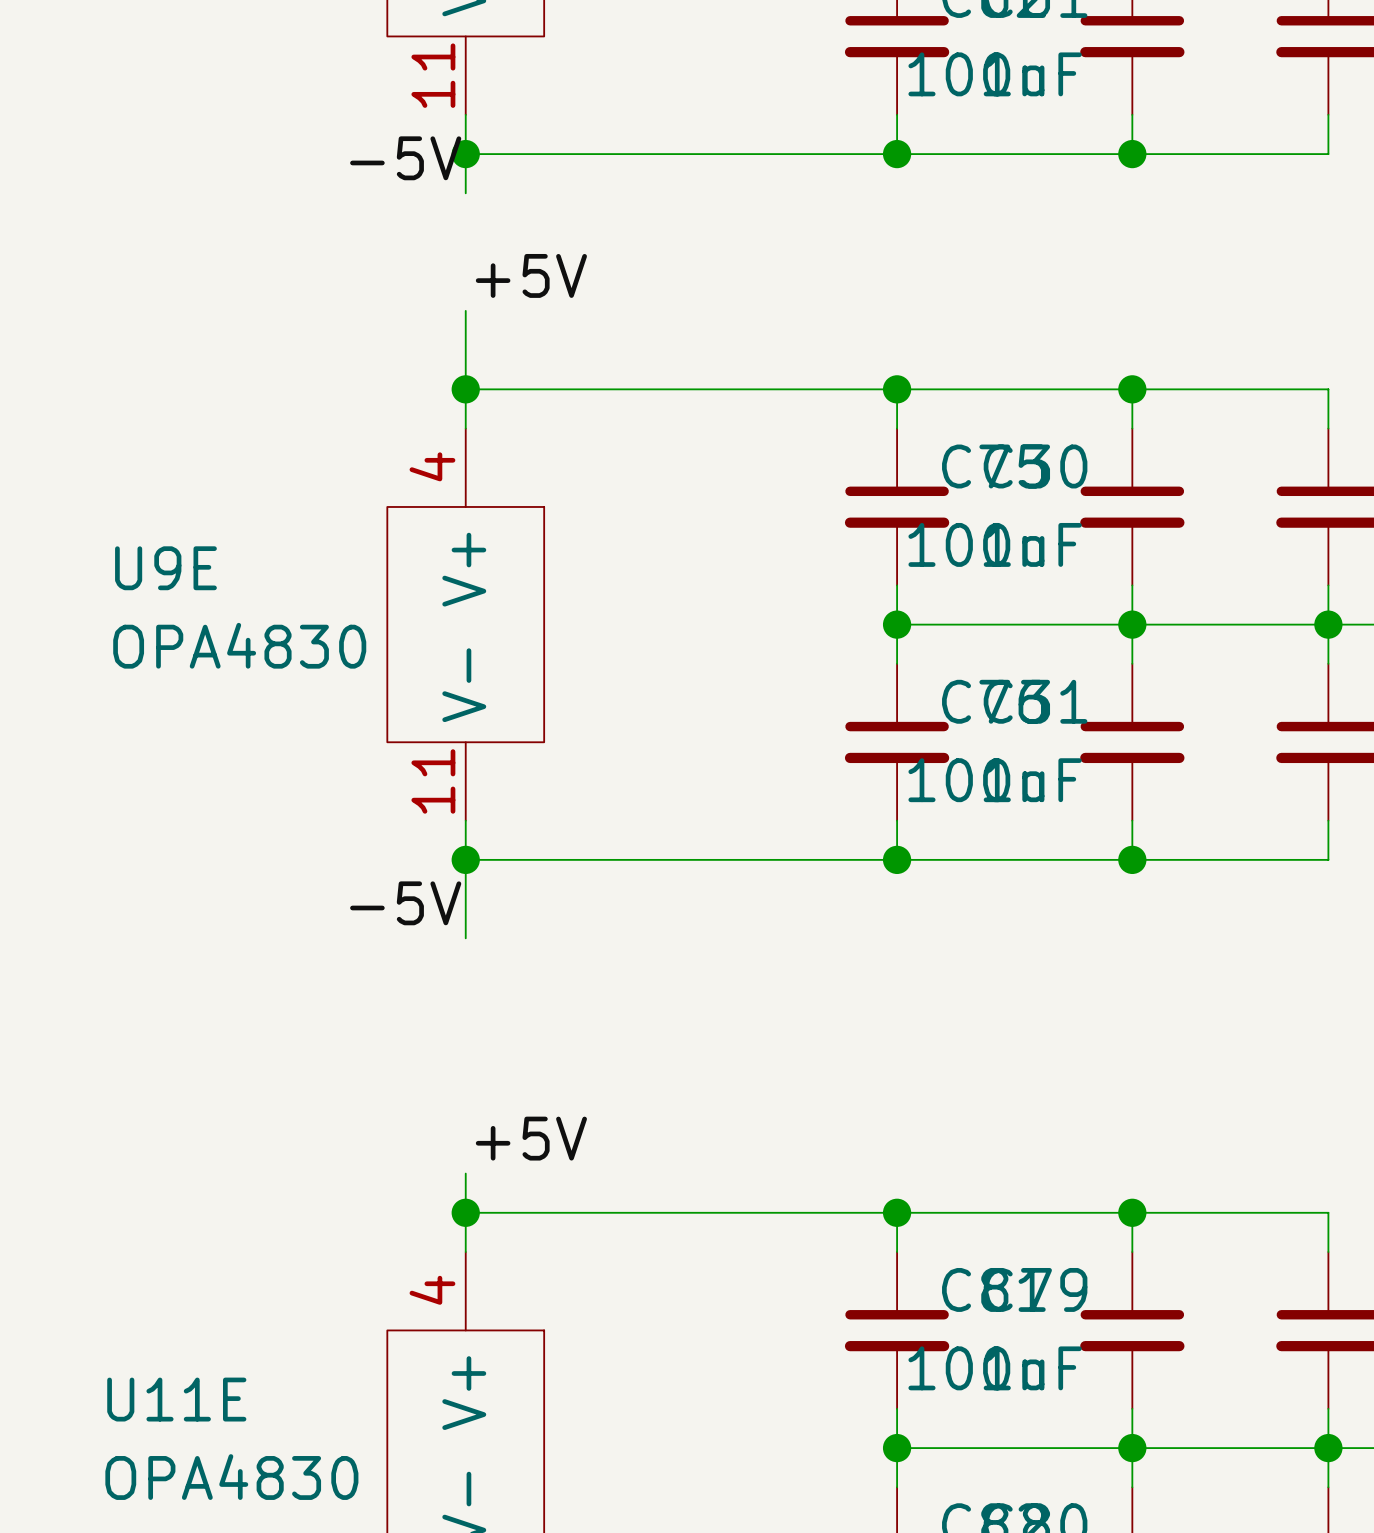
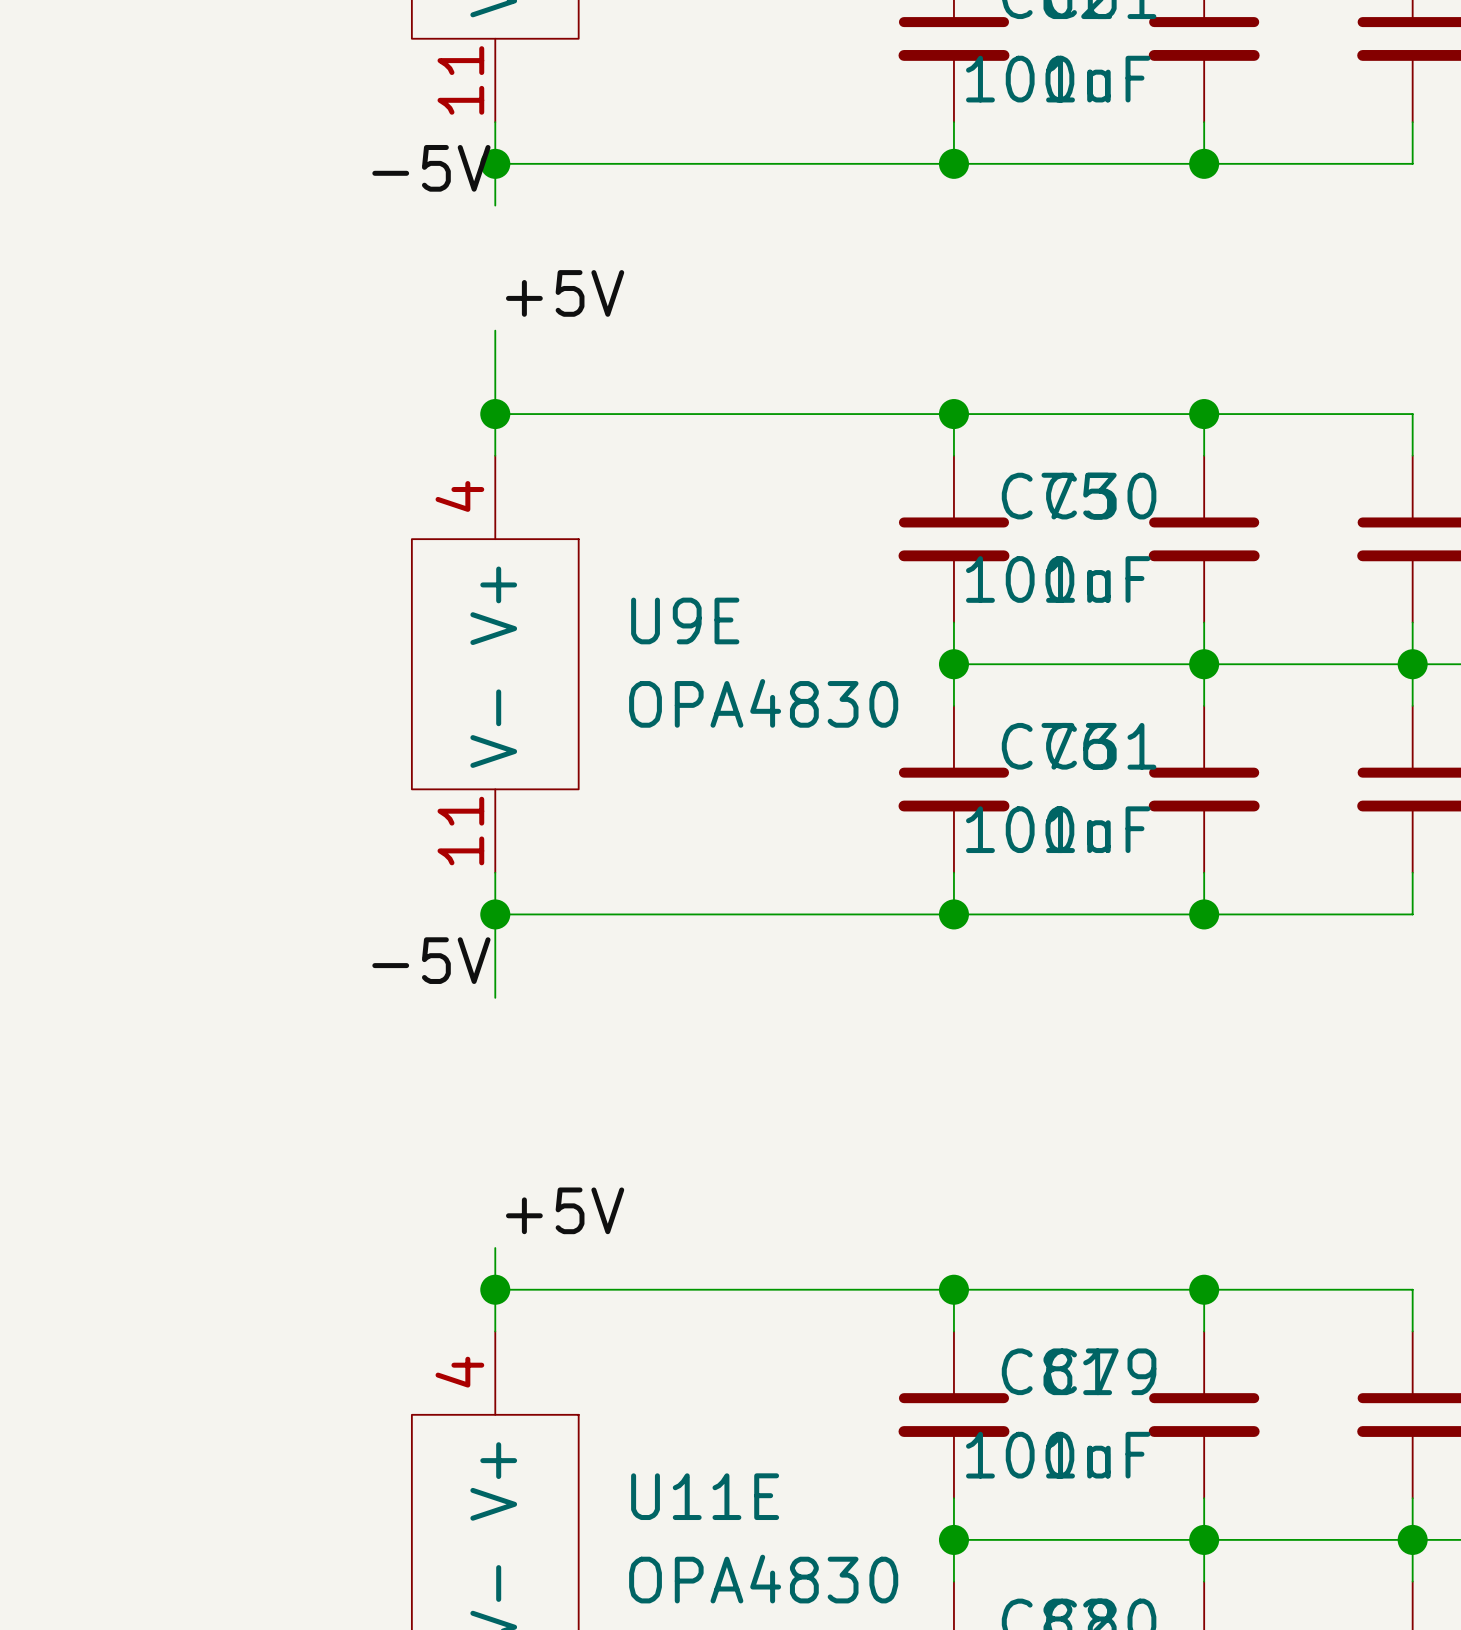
U9E name position: U9E (165, 568) -> U9E (685, 620)
U9E value position: OPA4830 (239, 645) -> OPA4830 (763, 703)
U11E name position: U11E (176, 1399) -> U11E (705, 1496)
U11E value position: OPA4830 (231, 1477) -> OPA4830 (763, 1579)

